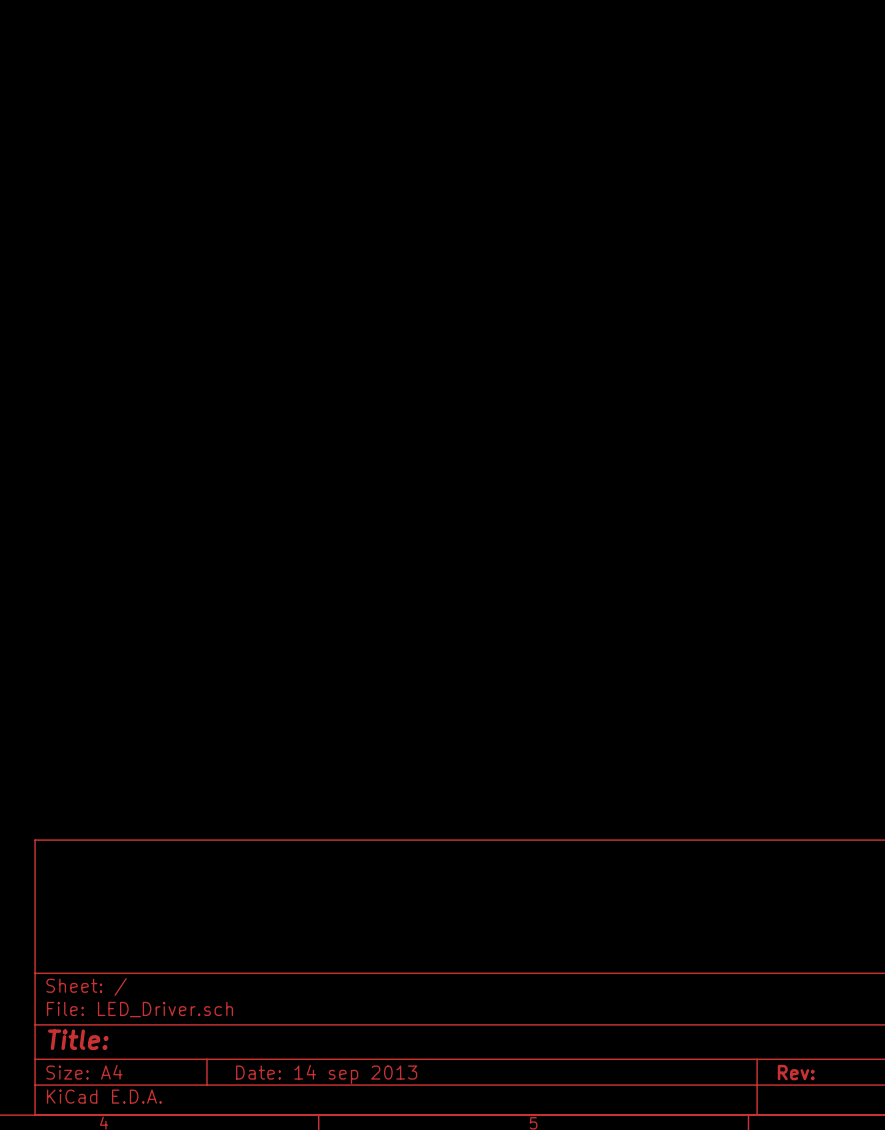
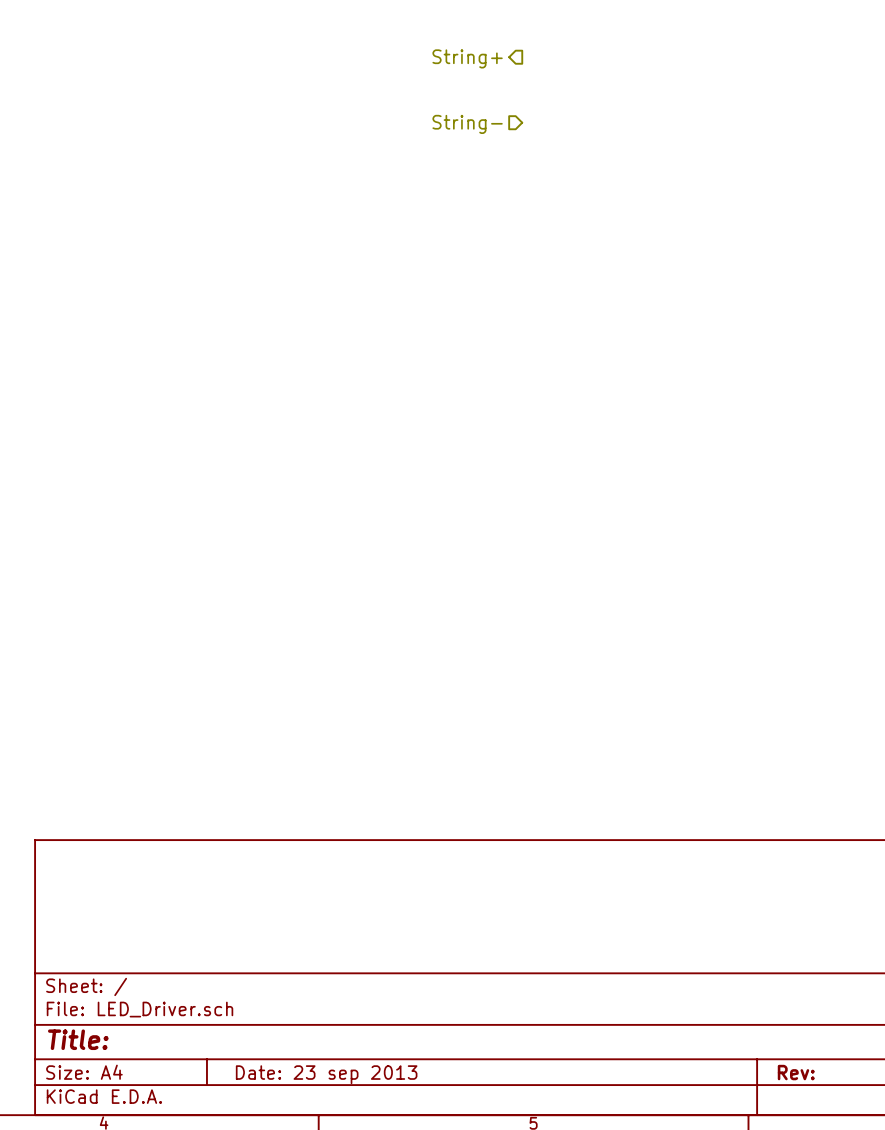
hierarchical label: none -> String+ (467, 58)
hierarchical label: none -> String- (467, 124)
title block: Date: 14 sep 2013 (326, 1074) -> Date: 23 sep 2013 (326, 1074)

